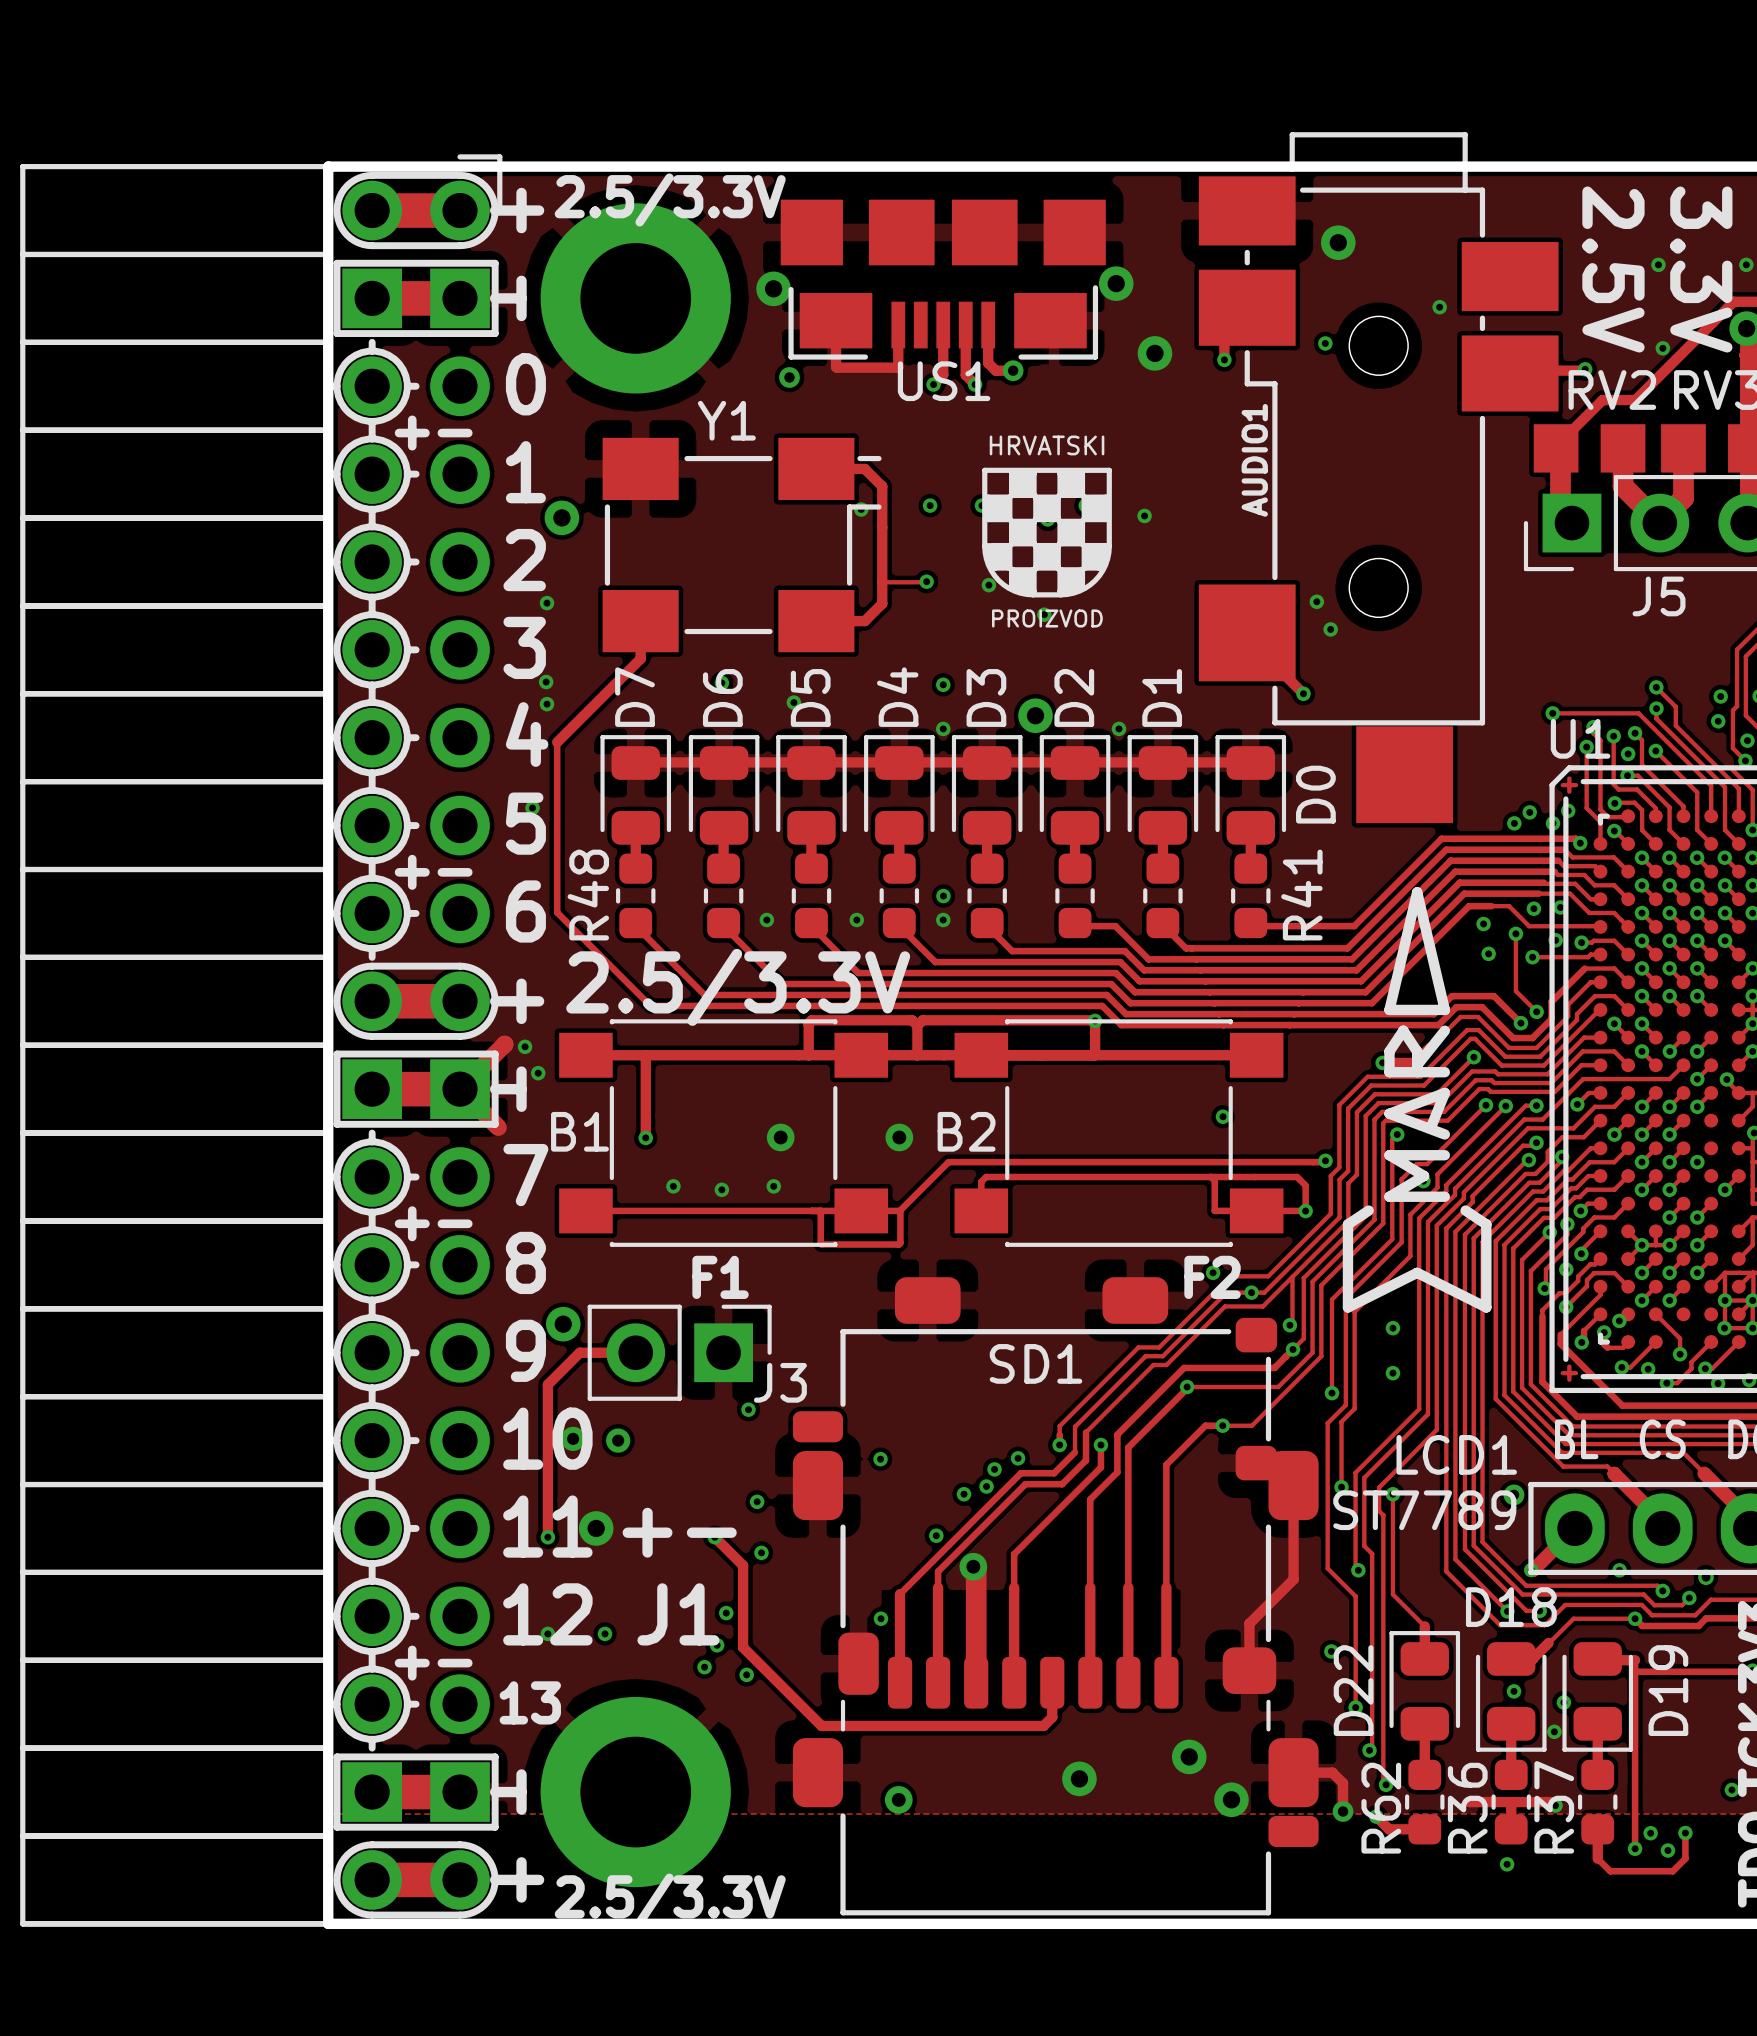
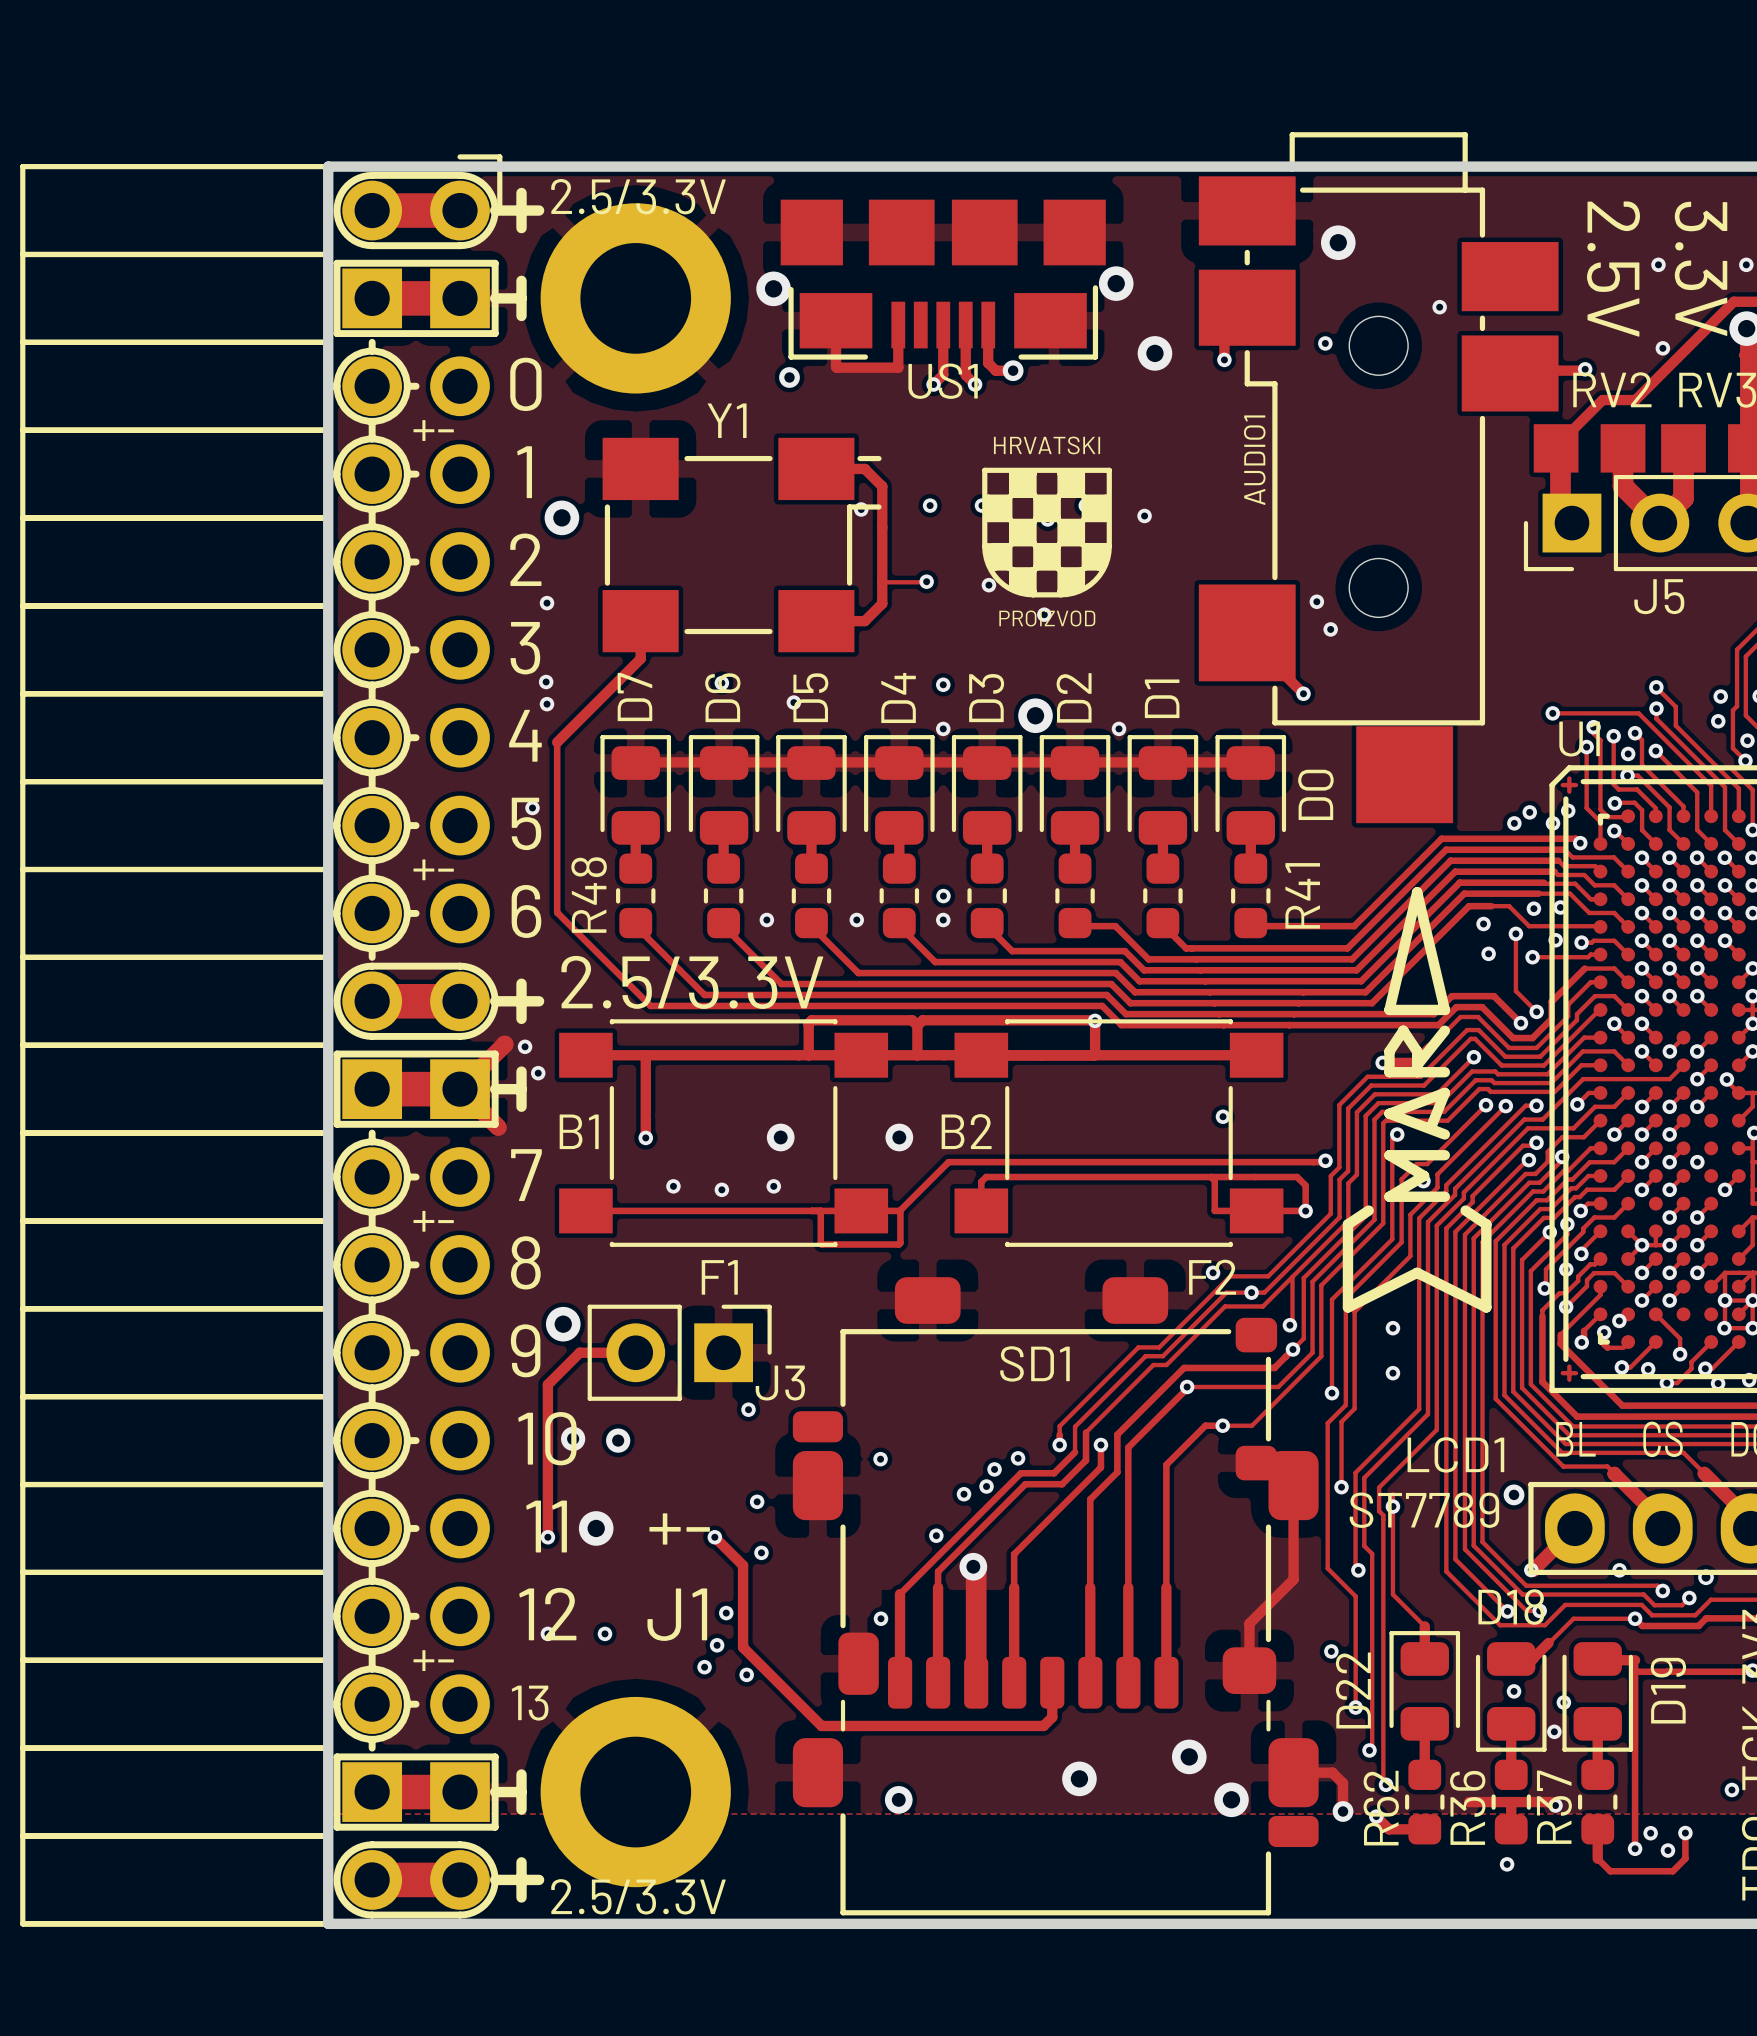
via position: (1392, 1494) -> (1392, 1506)

